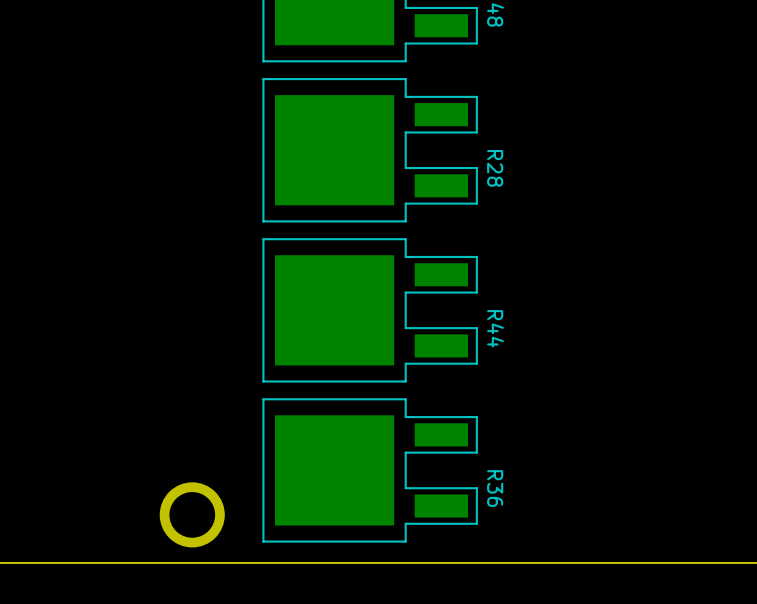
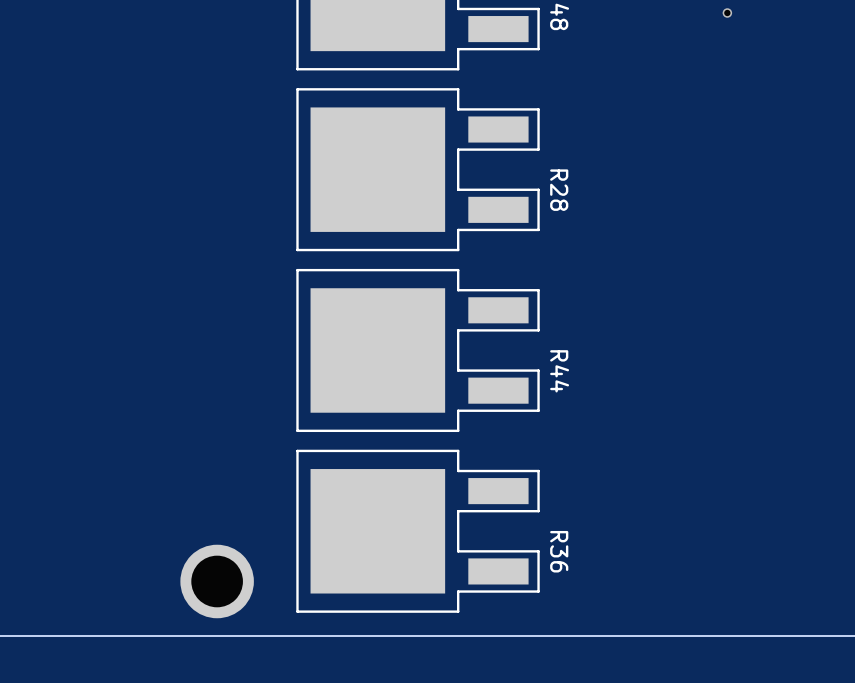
via: none -> (727, 13)

